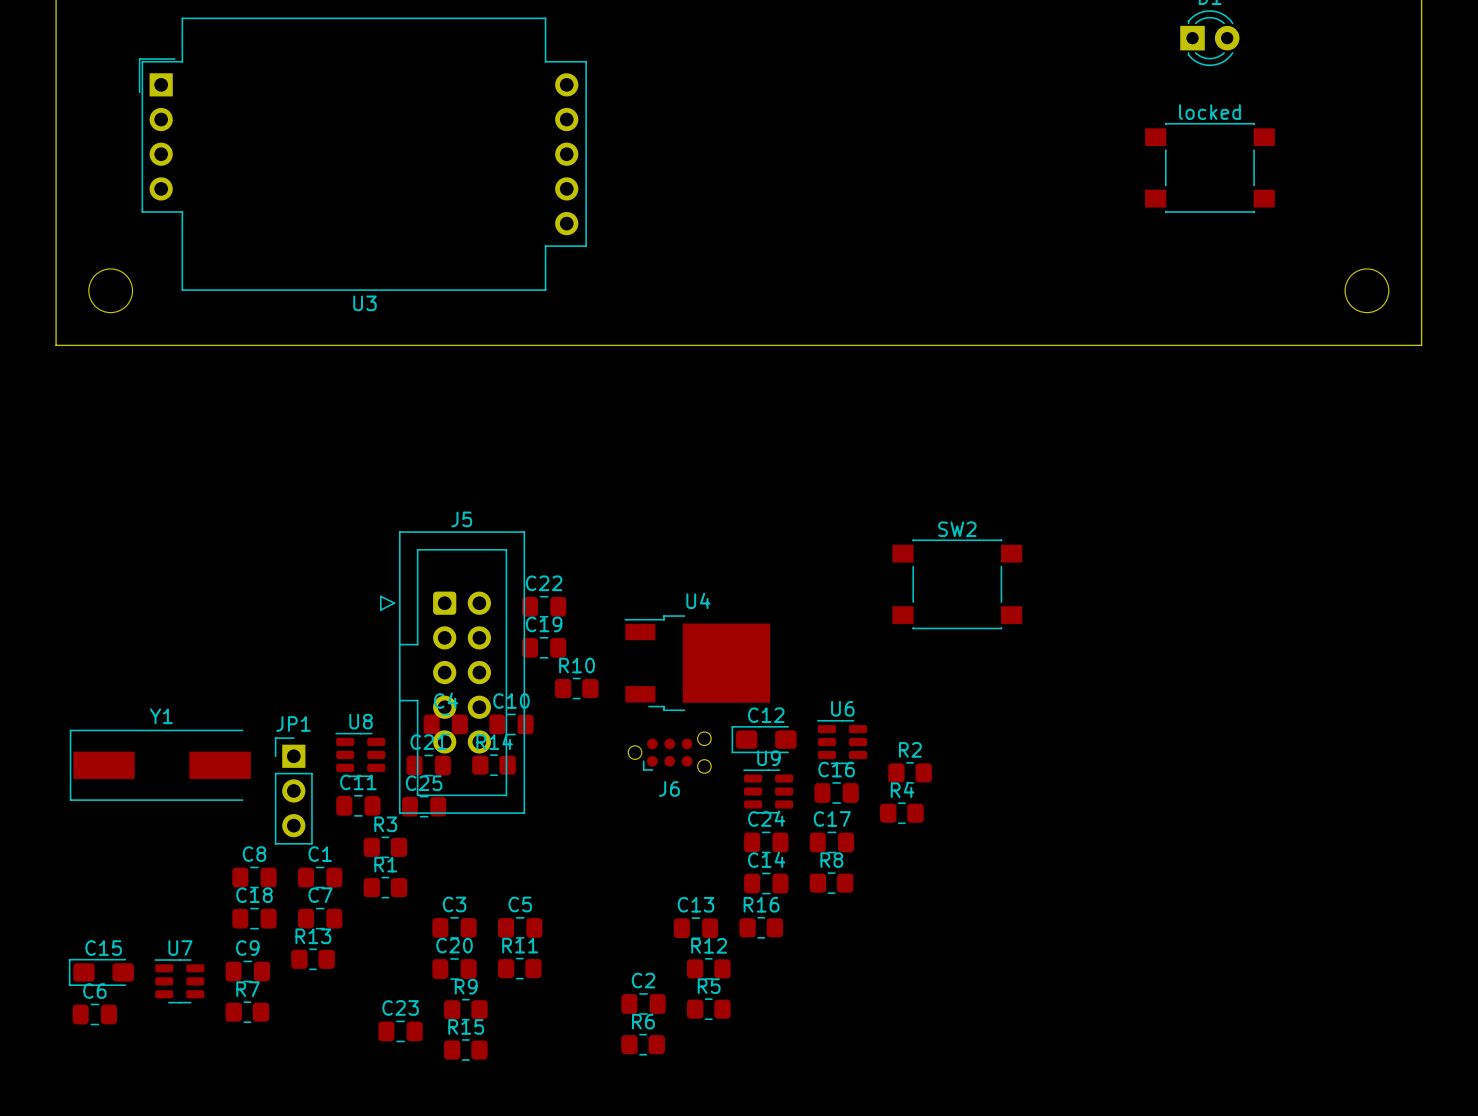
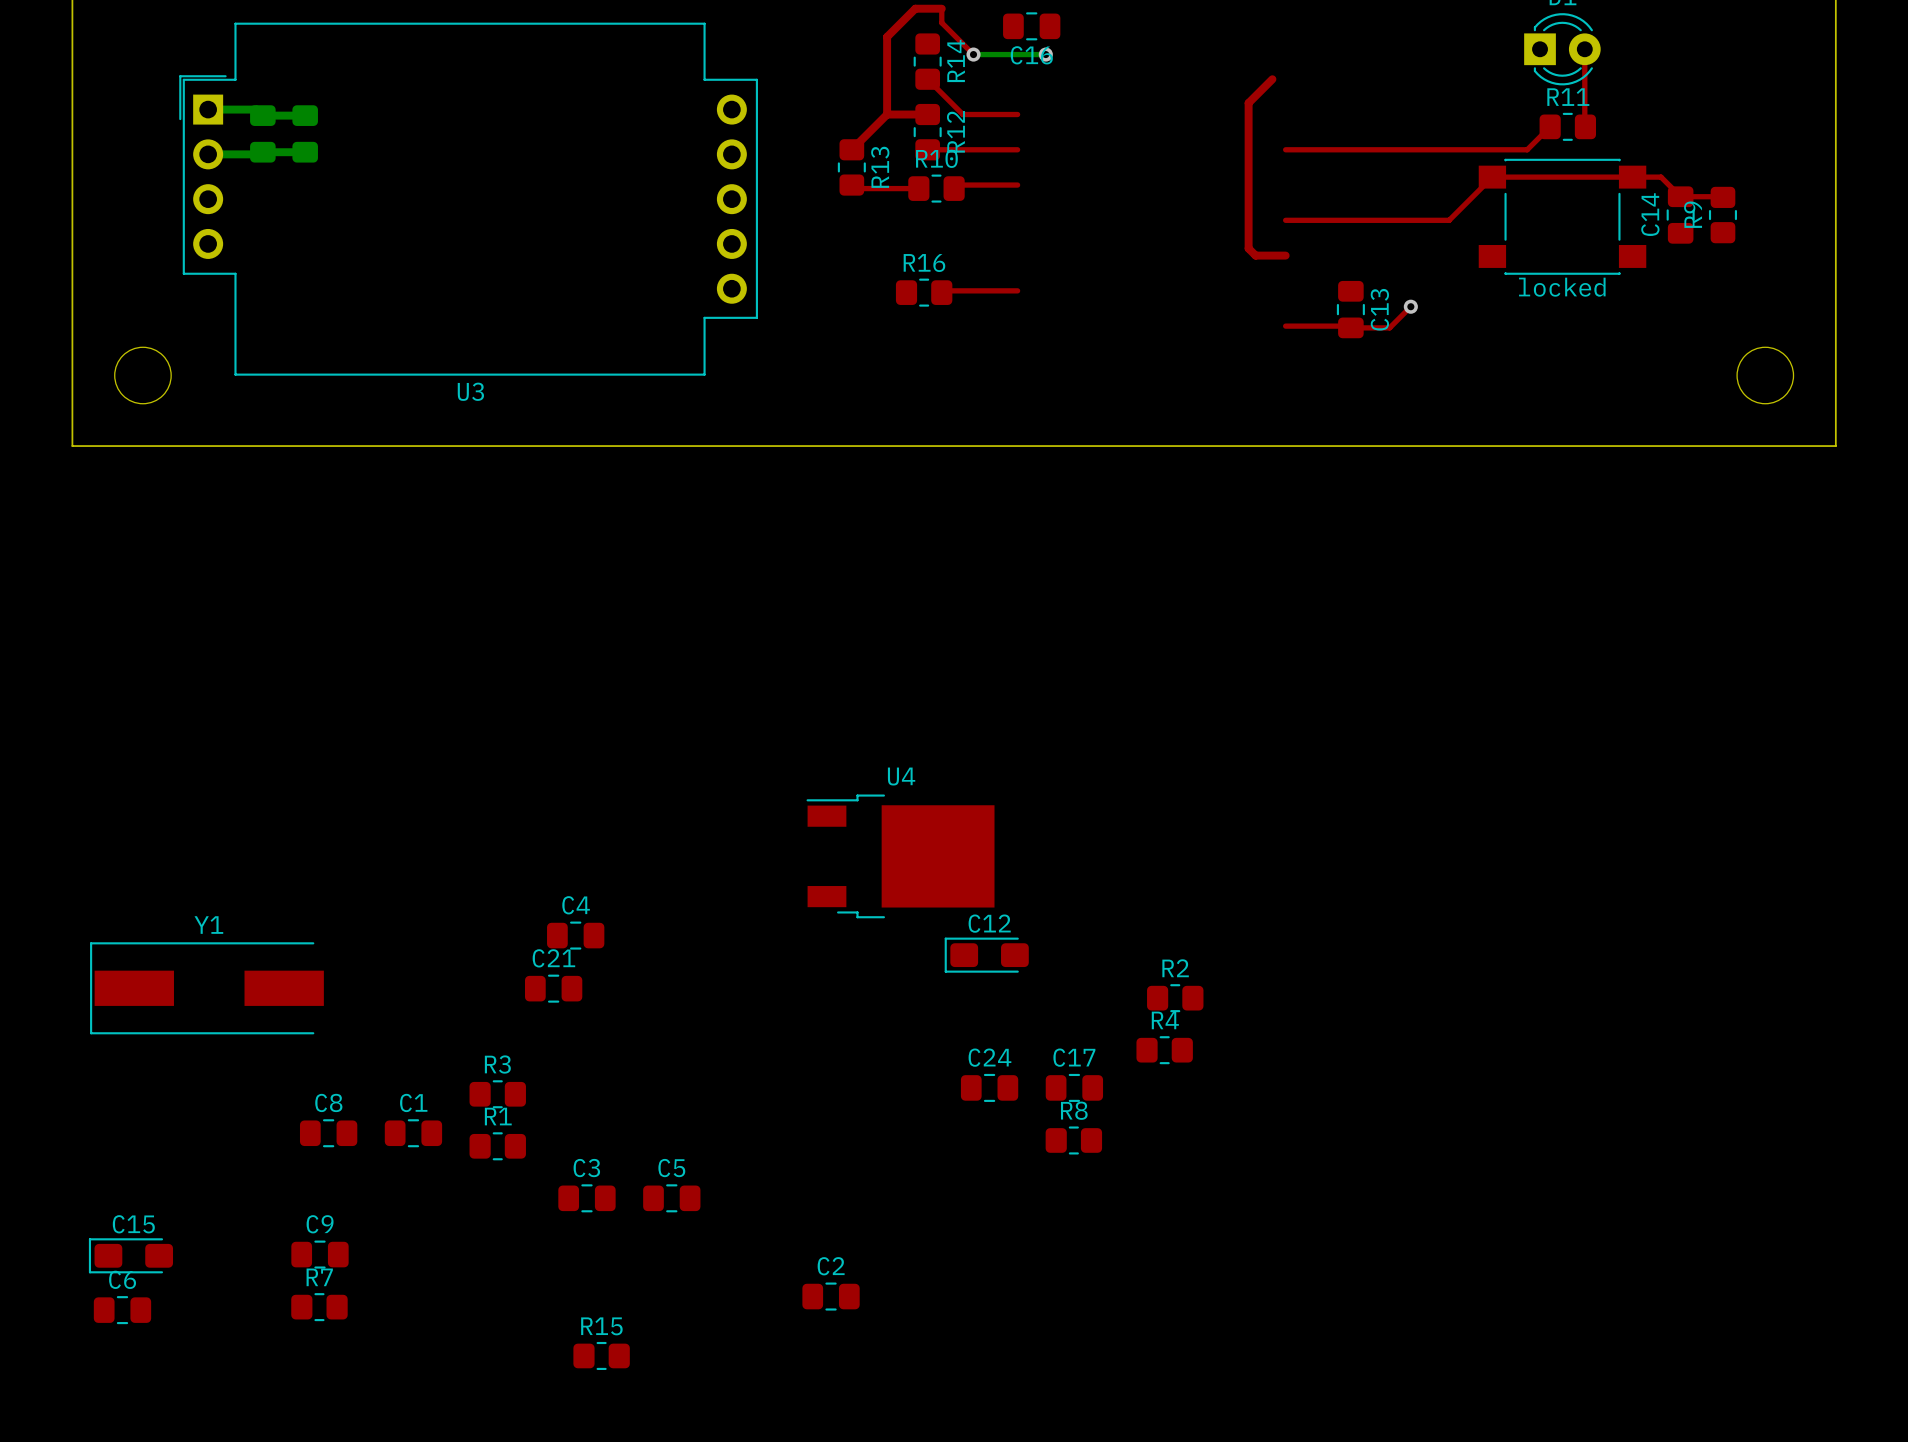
top track: none -> (1584, 49) (1585, 126)
top track: none -> (973, 54) (941, 22) (941, 8) (915, 8) (887, 36) (887, 114)
bottom track: none -> (973, 54) (1045, 54)
via: none -> (973, 54)
via: none -> (1045, 54)
top track: none -> (927, 79) (962, 114) (1017, 114)
top track: none -> (1272, 79) (1248, 103) (1248, 248) (1255, 255) (1285, 255)
bottom track: none -> (208, 109) (256, 109) (262, 115) (305, 115)
top track: none -> (887, 114) (851, 149)
top track: none -> (887, 114) (927, 114)
top track: none -> (1550, 126) (1527, 149) (1285, 149)
part: none -> (262, 133)
part: none -> (305, 133)
locked name position: locked (1209, 112) -> locked (1562, 287)
top track: none -> (927, 149) (1017, 149)
bottom track: none -> (305, 152) (208, 154)
top track: none -> (851, 185) (855, 188) (918, 188)
top track: none -> (1017, 185) (957, 185) (954, 188)
top track: none -> (1722, 197) (1680, 196) (1661, 177) (1492, 177) (1449, 220) (1285, 220)
top track: none -> (1017, 290) (943, 290) (941, 292)
top track: none -> (1410, 306) (1389, 327) (1285, 326)
via: none -> (1410, 306)
SW2: (957, 584) -> none
C22: (544, 606) -> none
C19: (544, 647) -> none
J5: (452, 672) -> none
R10 position: (576, 688) -> (936, 188)
C10: (511, 724) -> none
U6: (842, 742) -> none
J6: (669, 752) -> none
U8: (360, 754) -> none
R14 rotation: 0° (493, 765) -> 90° clockwise (927, 61)
R14 position: (493, 765) -> (927, 61)
C16 name position: C16 (836, 769) -> C16 (1031, 55)
JP1: (293, 790) -> none
U9: (768, 791) -> none
C16 position: (836, 793) -> (1031, 26)
C11: (358, 805) -> none
C25: (424, 806) -> none
C14 name position: C14 (766, 859) -> C14 (1650, 214)
C14 rotation: 0° (766, 883) -> 90° clockwise (1680, 215)
C14 position: (766, 883) -> (1680, 215)
C18: (254, 918) -> none
C7: (320, 918) -> none
R16 position: (761, 927) -> (924, 292)
C13 rotation: 0° (695, 928) -> 90° clockwise (1350, 309)
C13 position: (695, 928) -> (1350, 309)
R13 rotation: 0° (313, 959) -> 90° clockwise (851, 167)
R13 position: (313, 959) -> (851, 167)
R11 position: (519, 968) -> (1567, 126)
R12 rotation: 0° (708, 968) -> 90° clockwise (927, 132)
R12 position: (708, 968) -> (927, 132)
C20: (454, 969) -> none
U7: (179, 981) -> none
R9 name position: R9 (466, 986) -> R9 (1693, 214)
R9 rotation: 0° (465, 1009) -> 90° clockwise (1722, 215)
R9 position: (465, 1009) -> (1722, 215)
R5: (708, 1009) -> none
C23: (400, 1031) -> none
R6: (643, 1044) -> none

